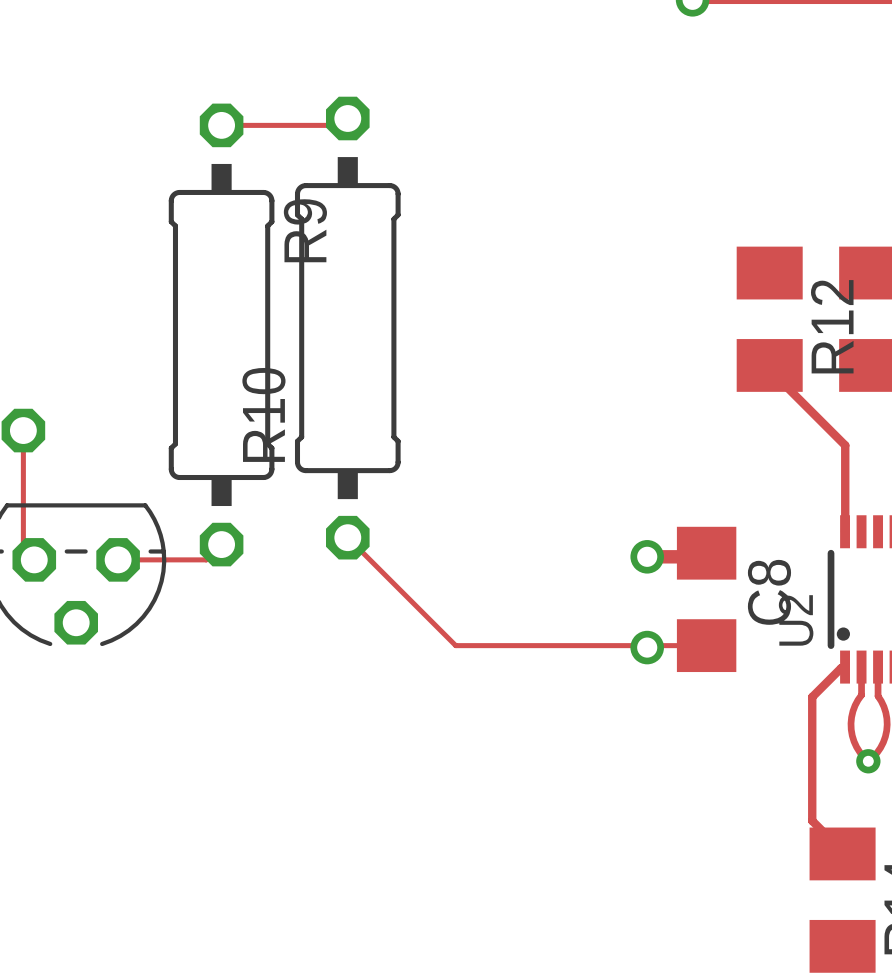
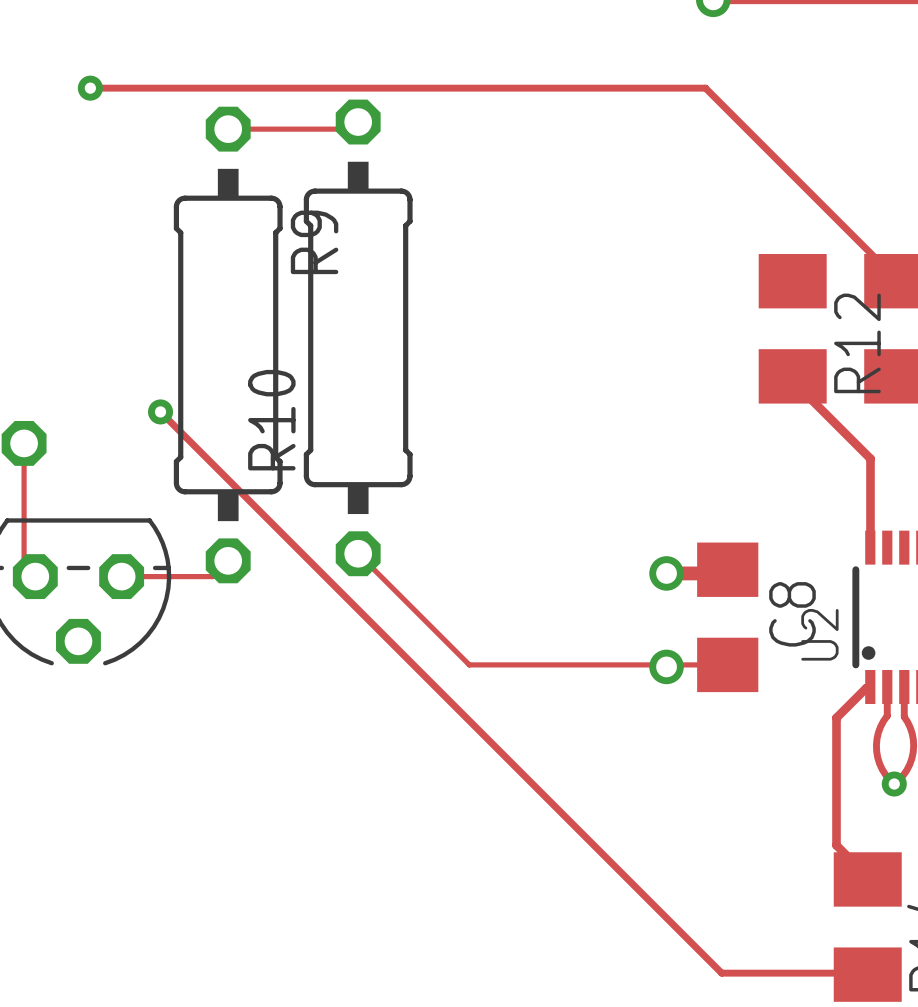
track: none -> (90, 88) (705, 88) (898, 281)
via: none -> (90, 88)
track: none -> (160, 411) (721, 973) (867, 974)
via: none -> (160, 411)

